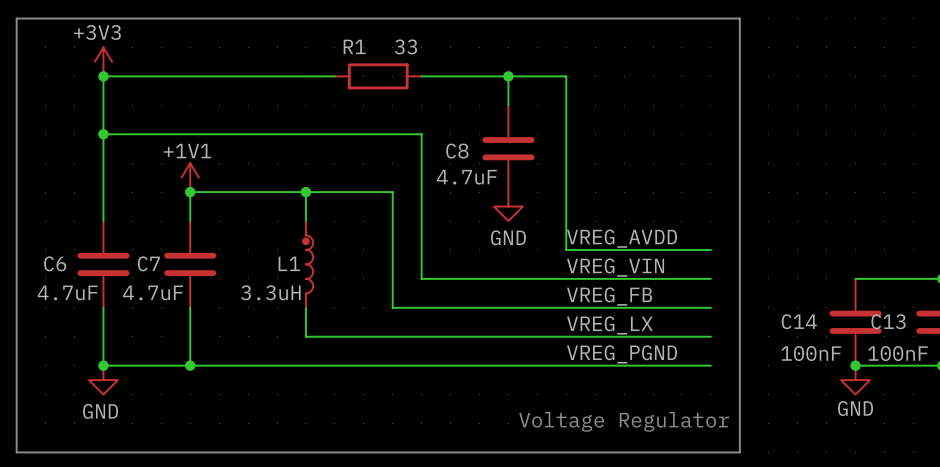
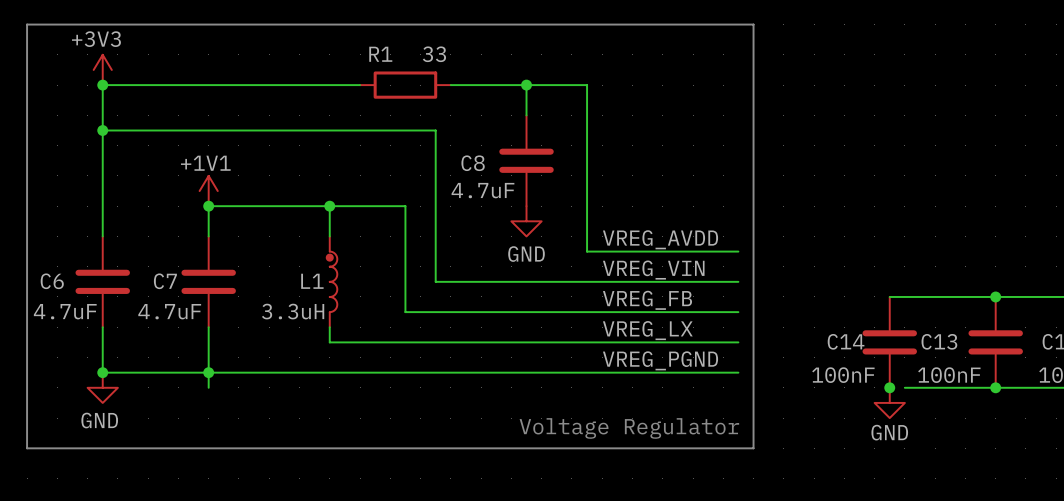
line: (710, 18) (739, 18) (739, 452) (16, 452) (16, 423) -> (753, 24) (753, 448) (27, 448)
power symbol position: +3V3 (103, 61) -> +3V3 (102, 69)
wire: (103, 76) (103, 221) -> (117, 85) (102, 85) (102, 236)
junction position: (103, 76) -> (102, 85)
wire: (508, 76) (508, 105) -> (526, 85) (526, 115)
junction position: (508, 76) -> (526, 85)
wire: (551, 76) (566, 76) (566, 249) (710, 249) -> (587, 85) (587, 251) (738, 251)
wire: (103, 134) (421, 134) (421, 278) (710, 278) -> (102, 130) (435, 130) (435, 281) (738, 281)
junction position: (103, 134) -> (102, 130)
C8 position: (508, 148) -> (526, 160)
wire: (378, 192) (392, 192) (392, 307) (710, 307) -> (405, 206) (405, 312) (738, 312)
power symbol position: GND (508, 206) -> GND (526, 221)
label position: VREG_AVDD (622, 238) -> VREG_AVDD (660, 239)
C6 position: (103, 264) -> (102, 281)
label position: VREG_VIN (615, 267) -> VREG_VIN (653, 270)
wire: none -> (889, 296) (904, 296)
label position: VREG_FB (609, 296) -> VREG_FB (647, 300)
wire: none -> (102, 327) (102, 372) (738, 372)
wire: (103, 307) (103, 365) (710, 365) -> none
wire: (305, 322) (305, 336) (710, 336) -> (329, 342) (738, 342)
C14 position: (855, 322) -> (889, 342)
label position: VREG_LX (609, 325) -> VREG_LX (647, 330)
label position: VREG_PGND (622, 354) -> VREG_PGND (660, 360)
junction position: (103, 365) -> (102, 372)
junction position: (190, 365) -> (208, 372)
junction position: (855, 365) -> (889, 387)
power symbol position: GND (103, 380) -> GND (102, 387)
power symbol position: GND (855, 380) -> GND (889, 402)
text position: Voltage Regulator (624, 421) -> Voltage Regulator (629, 428)

